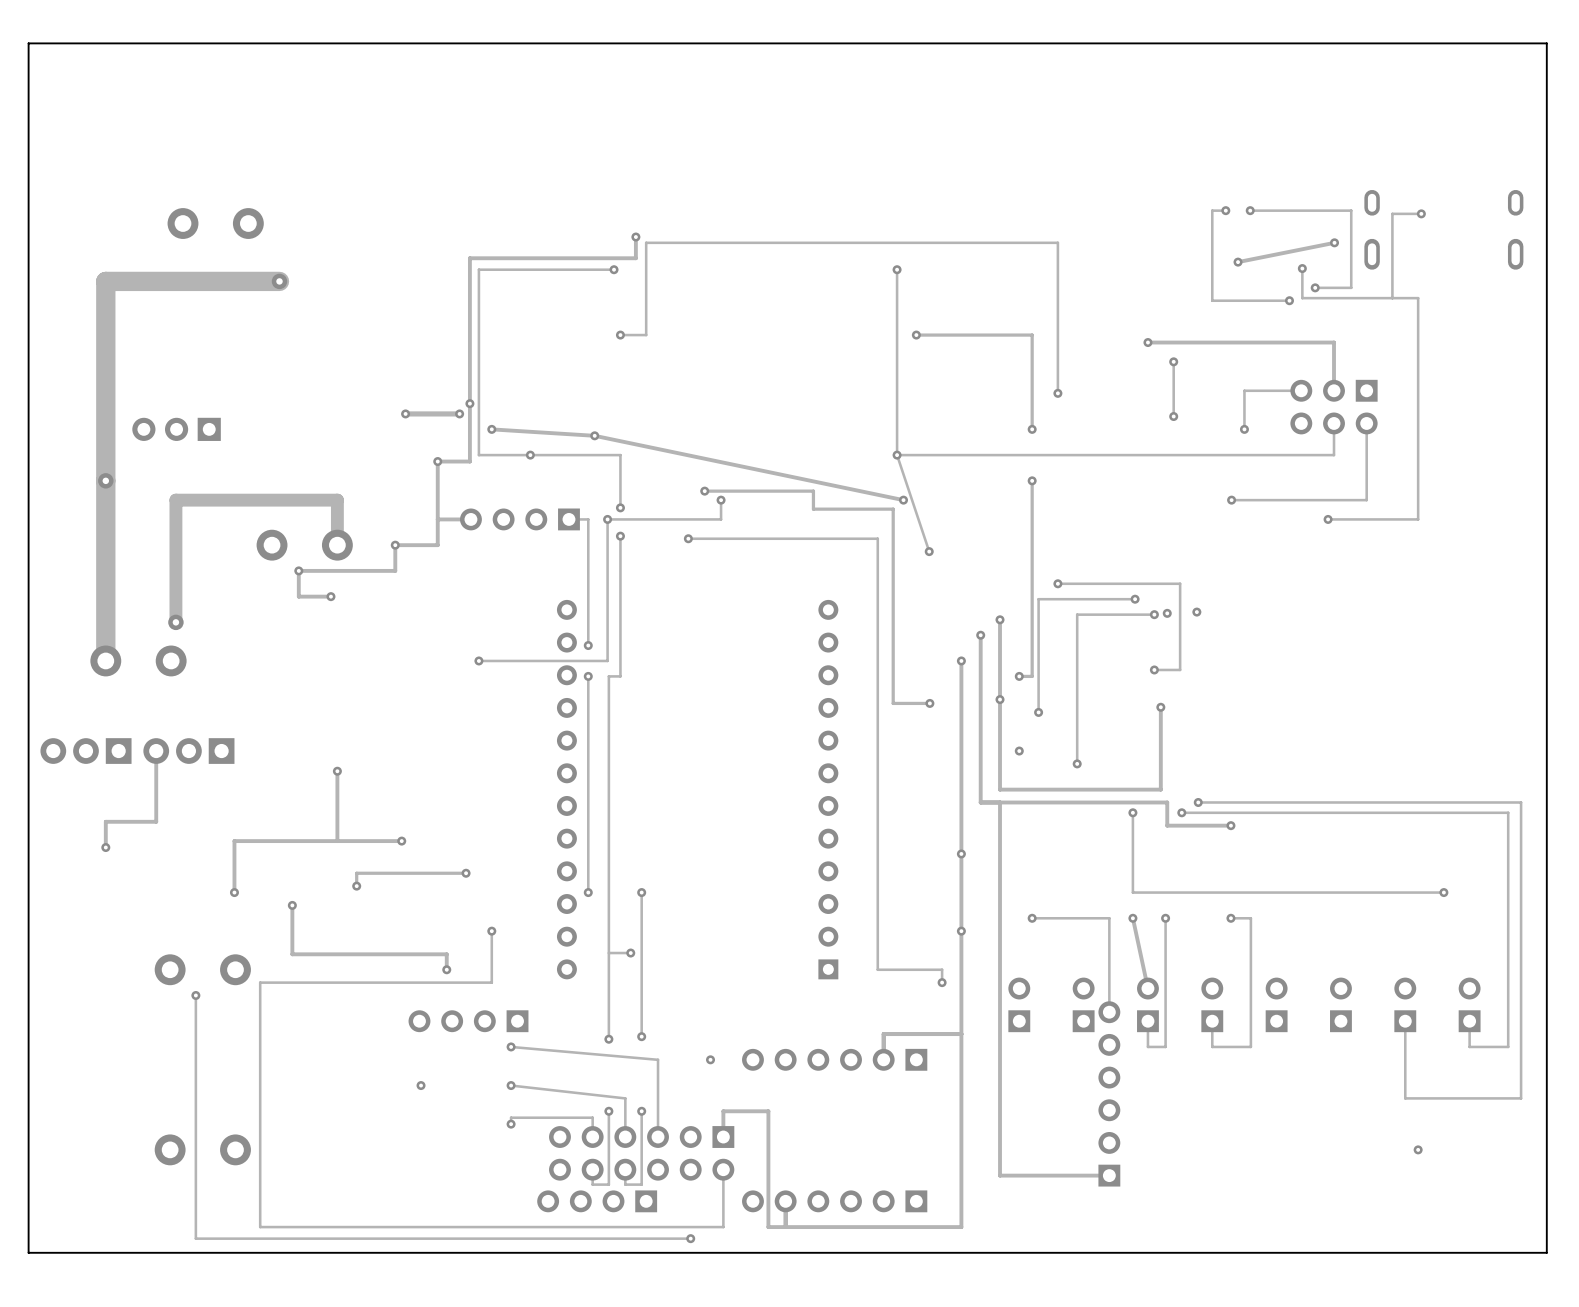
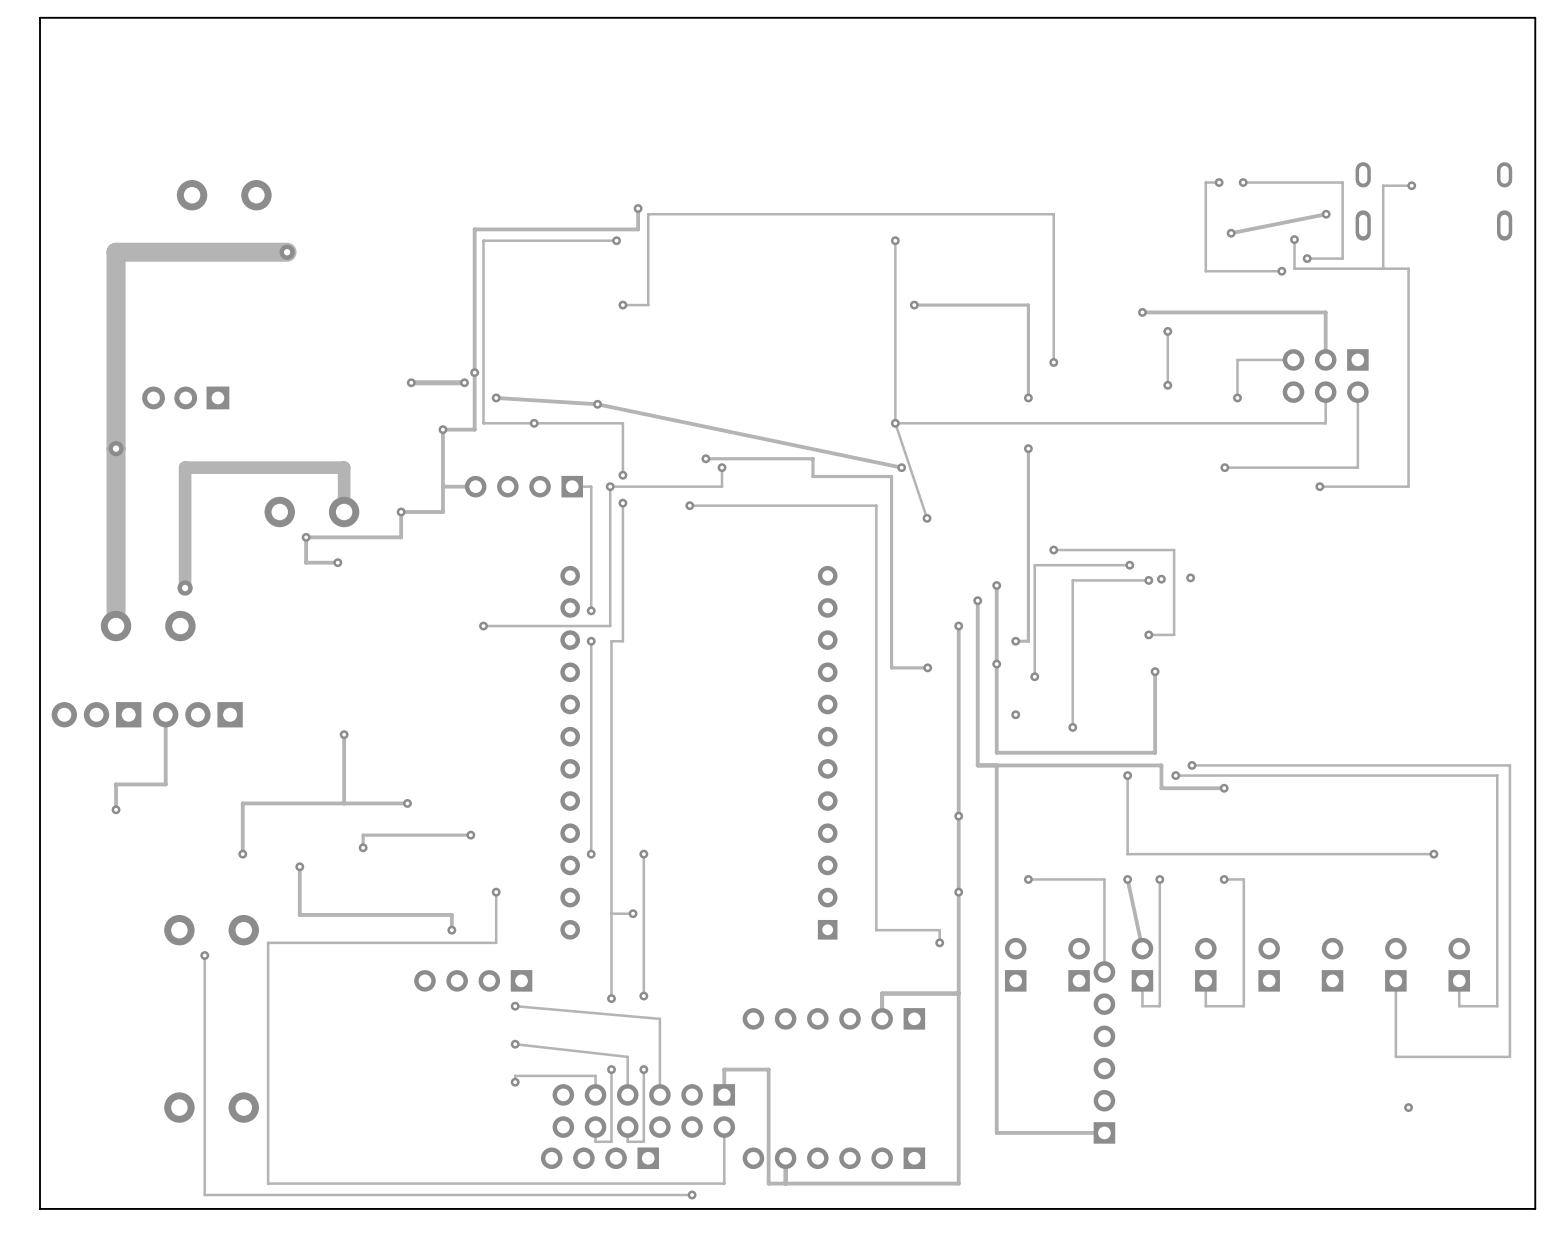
via: (710, 1059) -> none
via: (421, 1085) -> none

